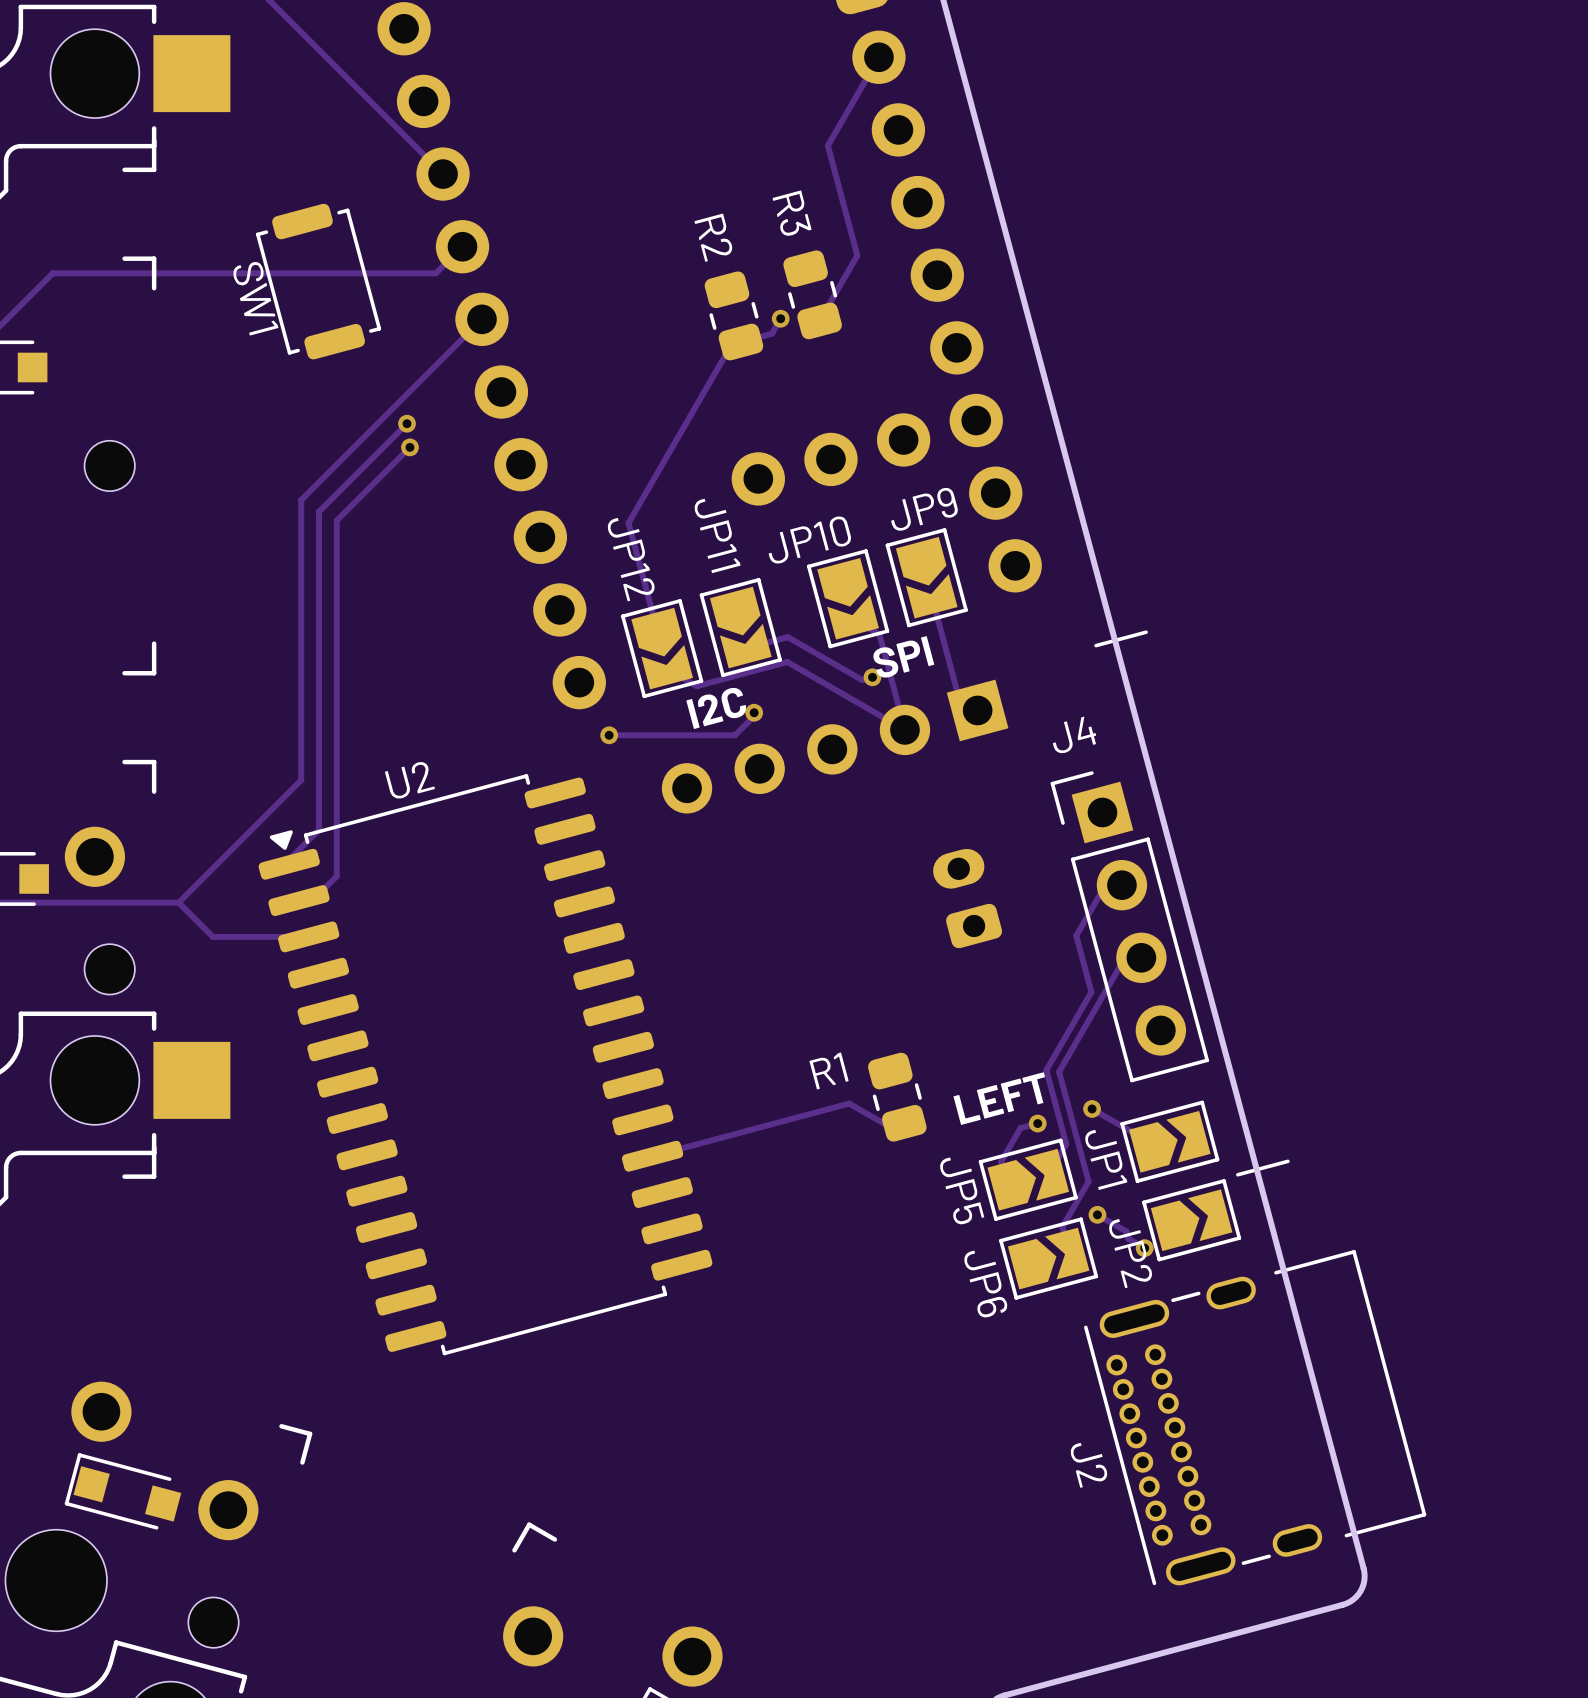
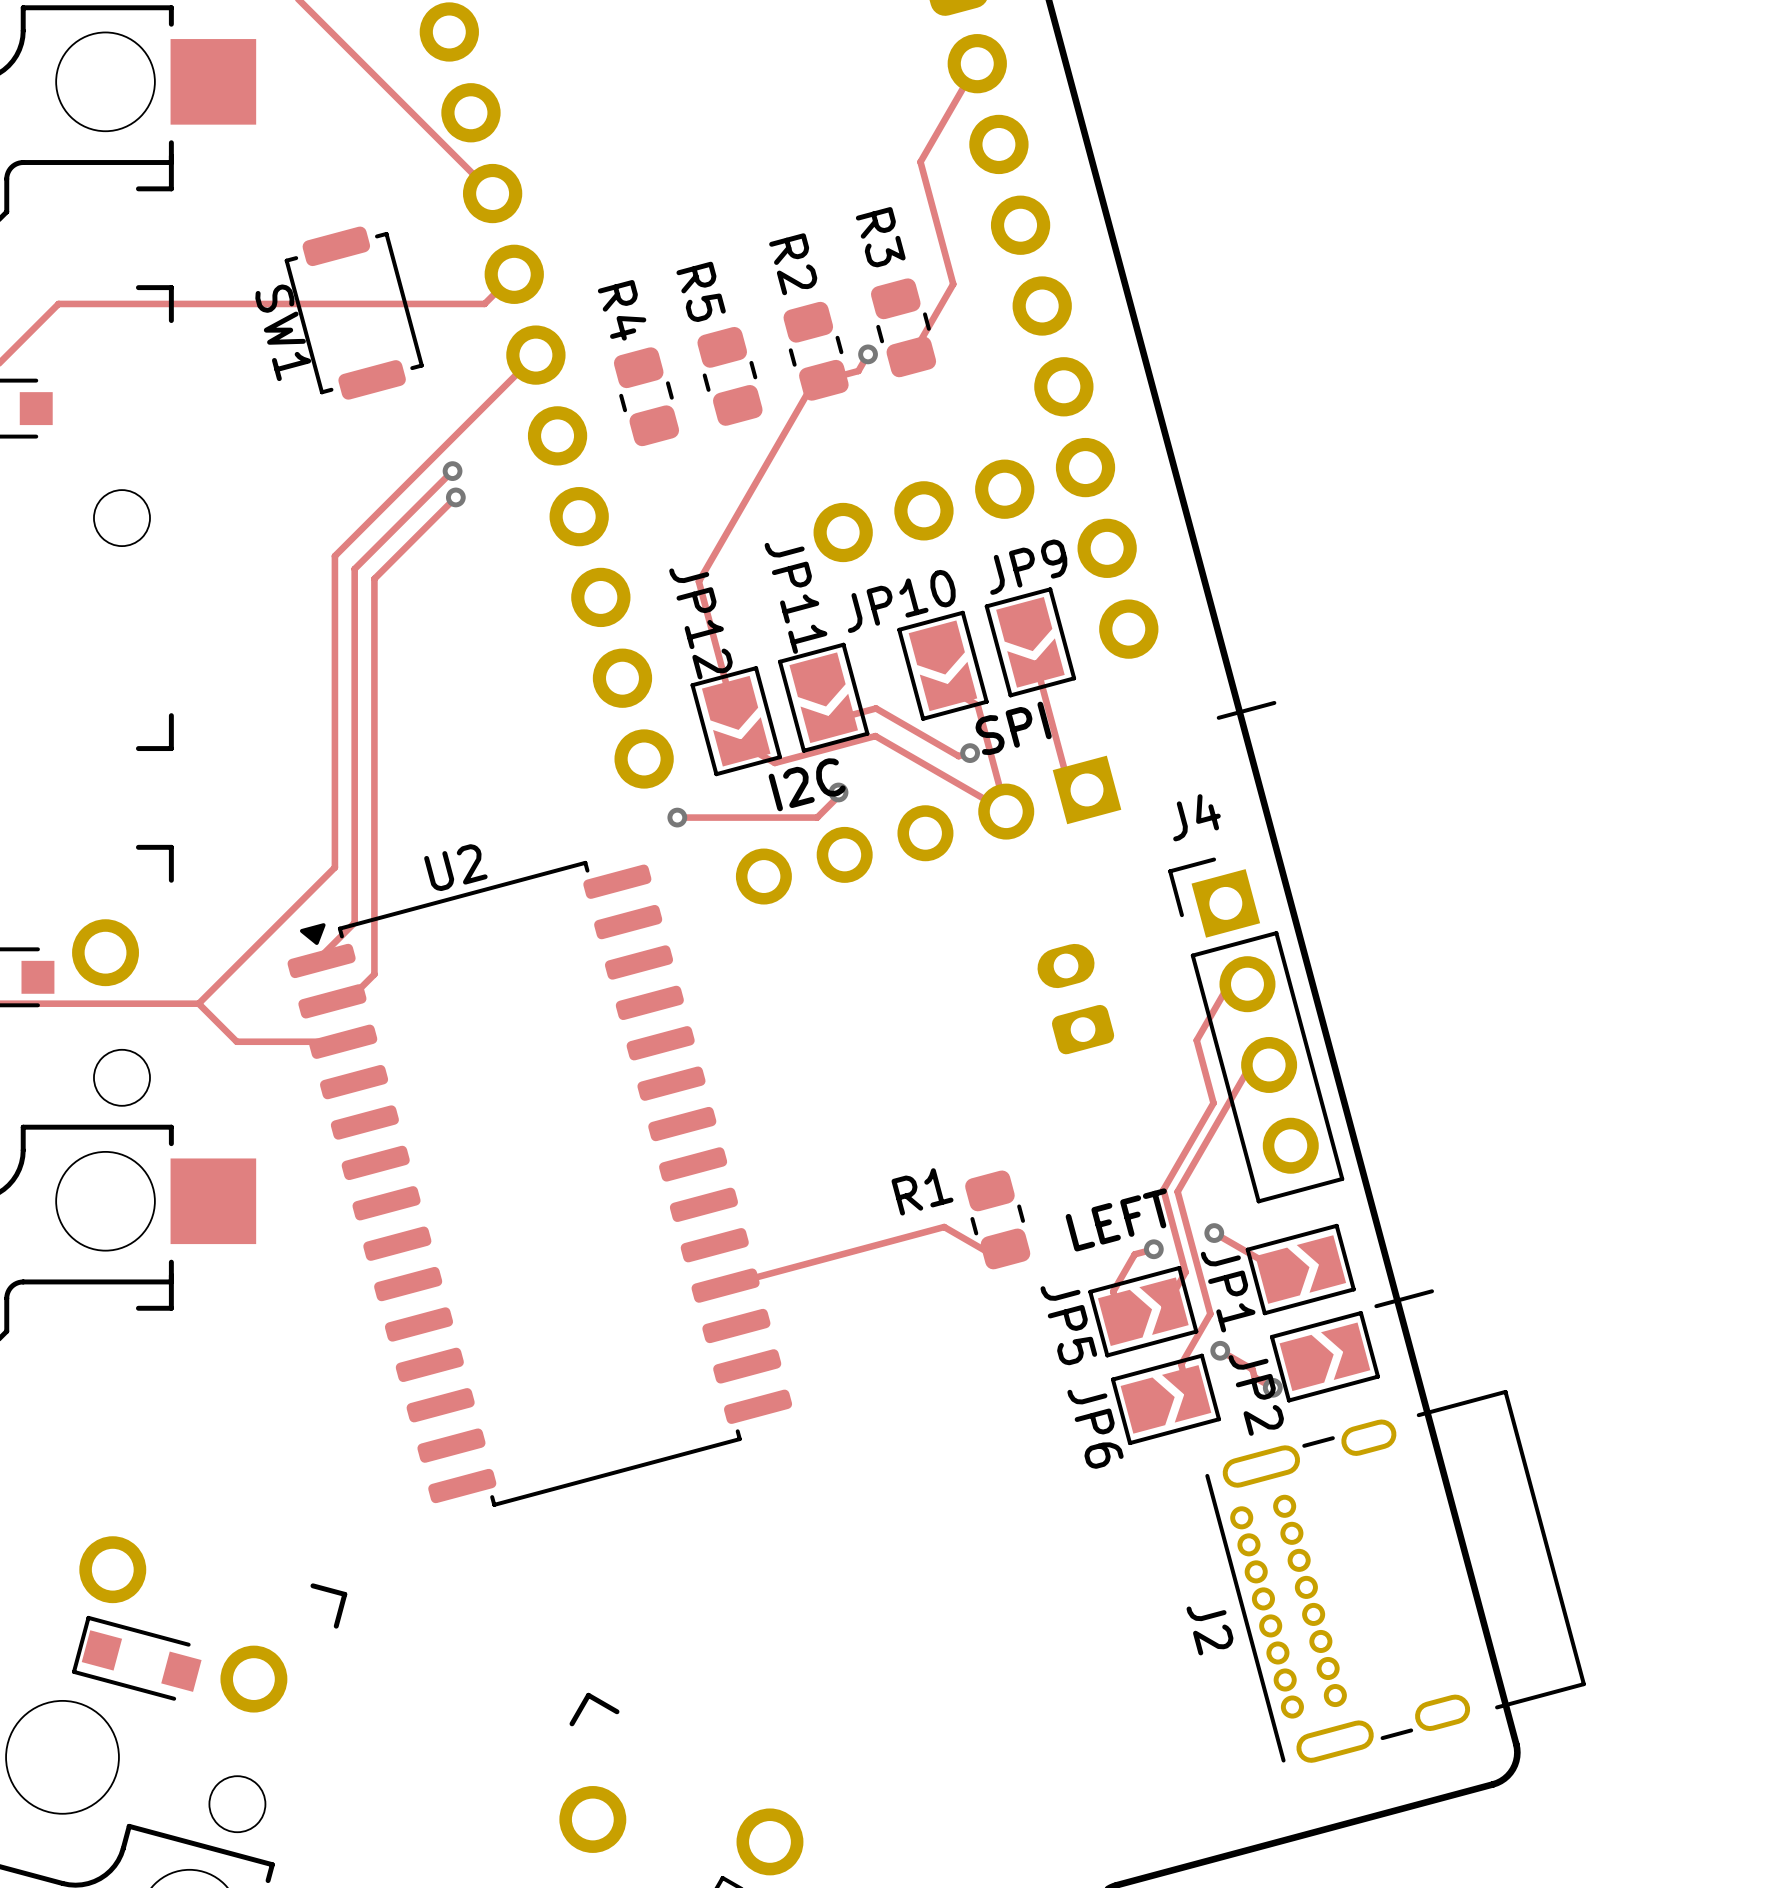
R5: none -> (730, 376)
R4: none -> (646, 396)

